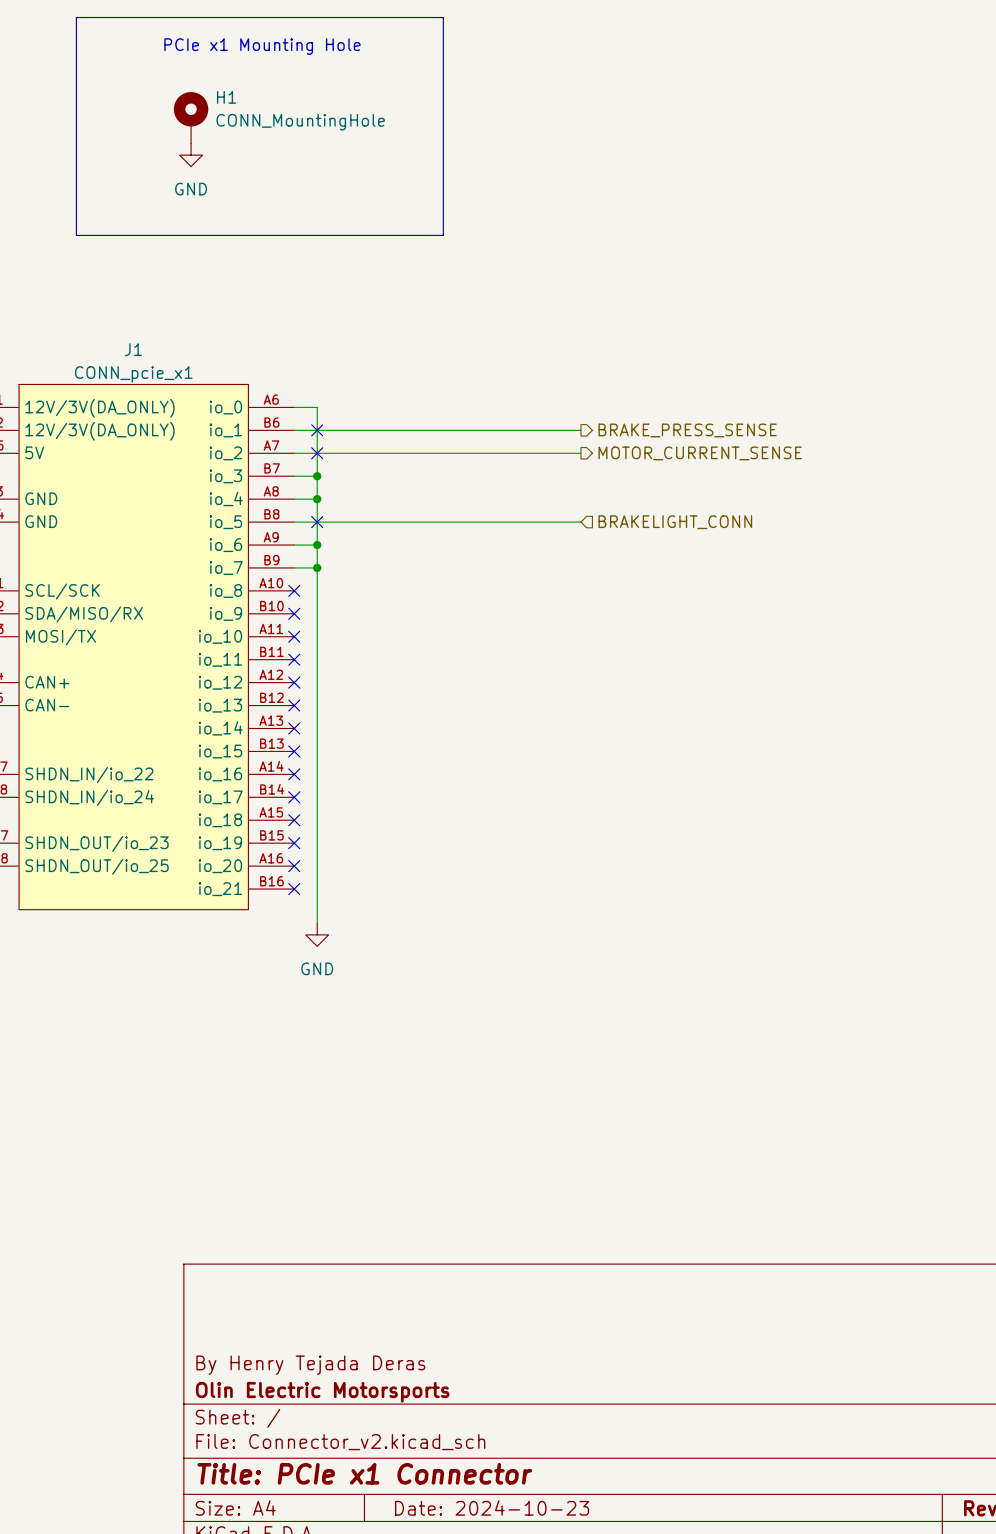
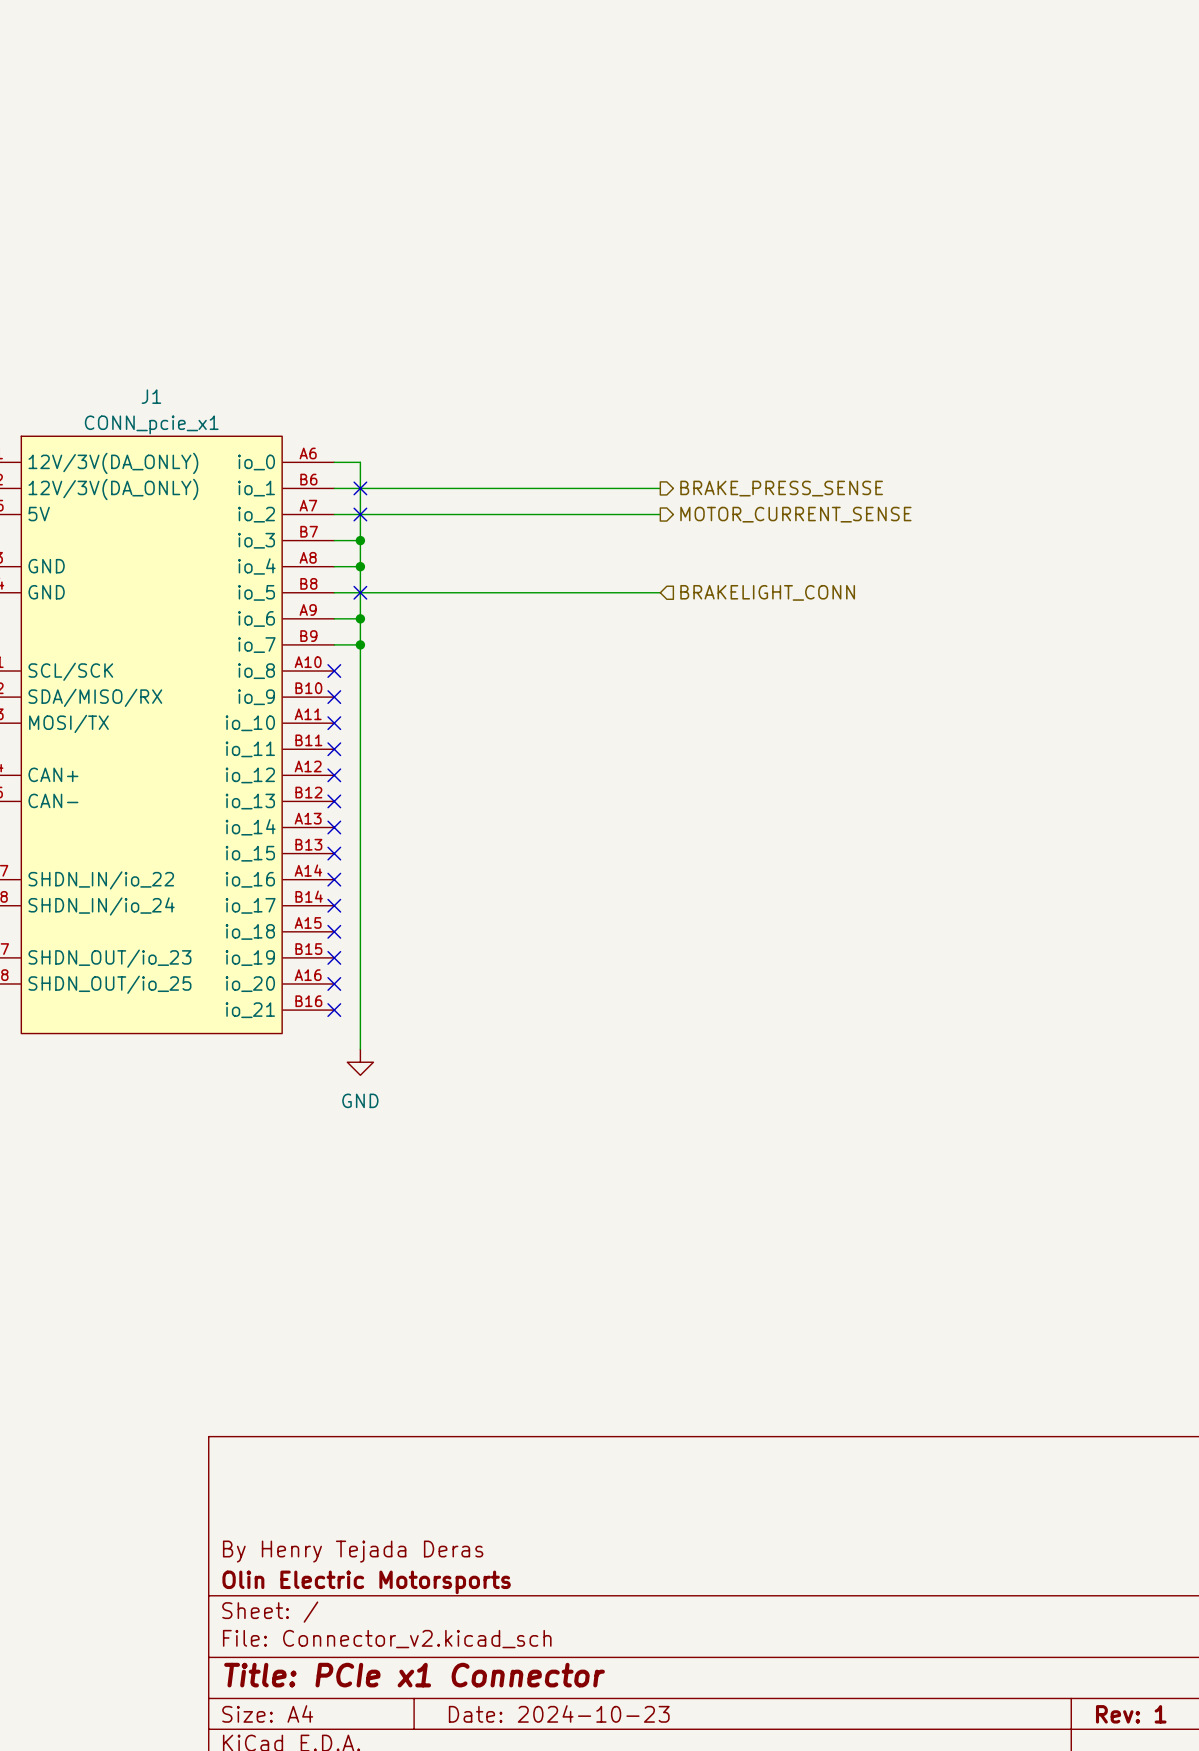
line: (76, 17) (443, 17) (443, 235) (76, 235) (76, 17) -> none
text: PCIe x1 Mounting Hole (262, 46) -> none
H1: CONN_MountingHole (191, 117) -> none
power symbol: GND (191, 155) -> none

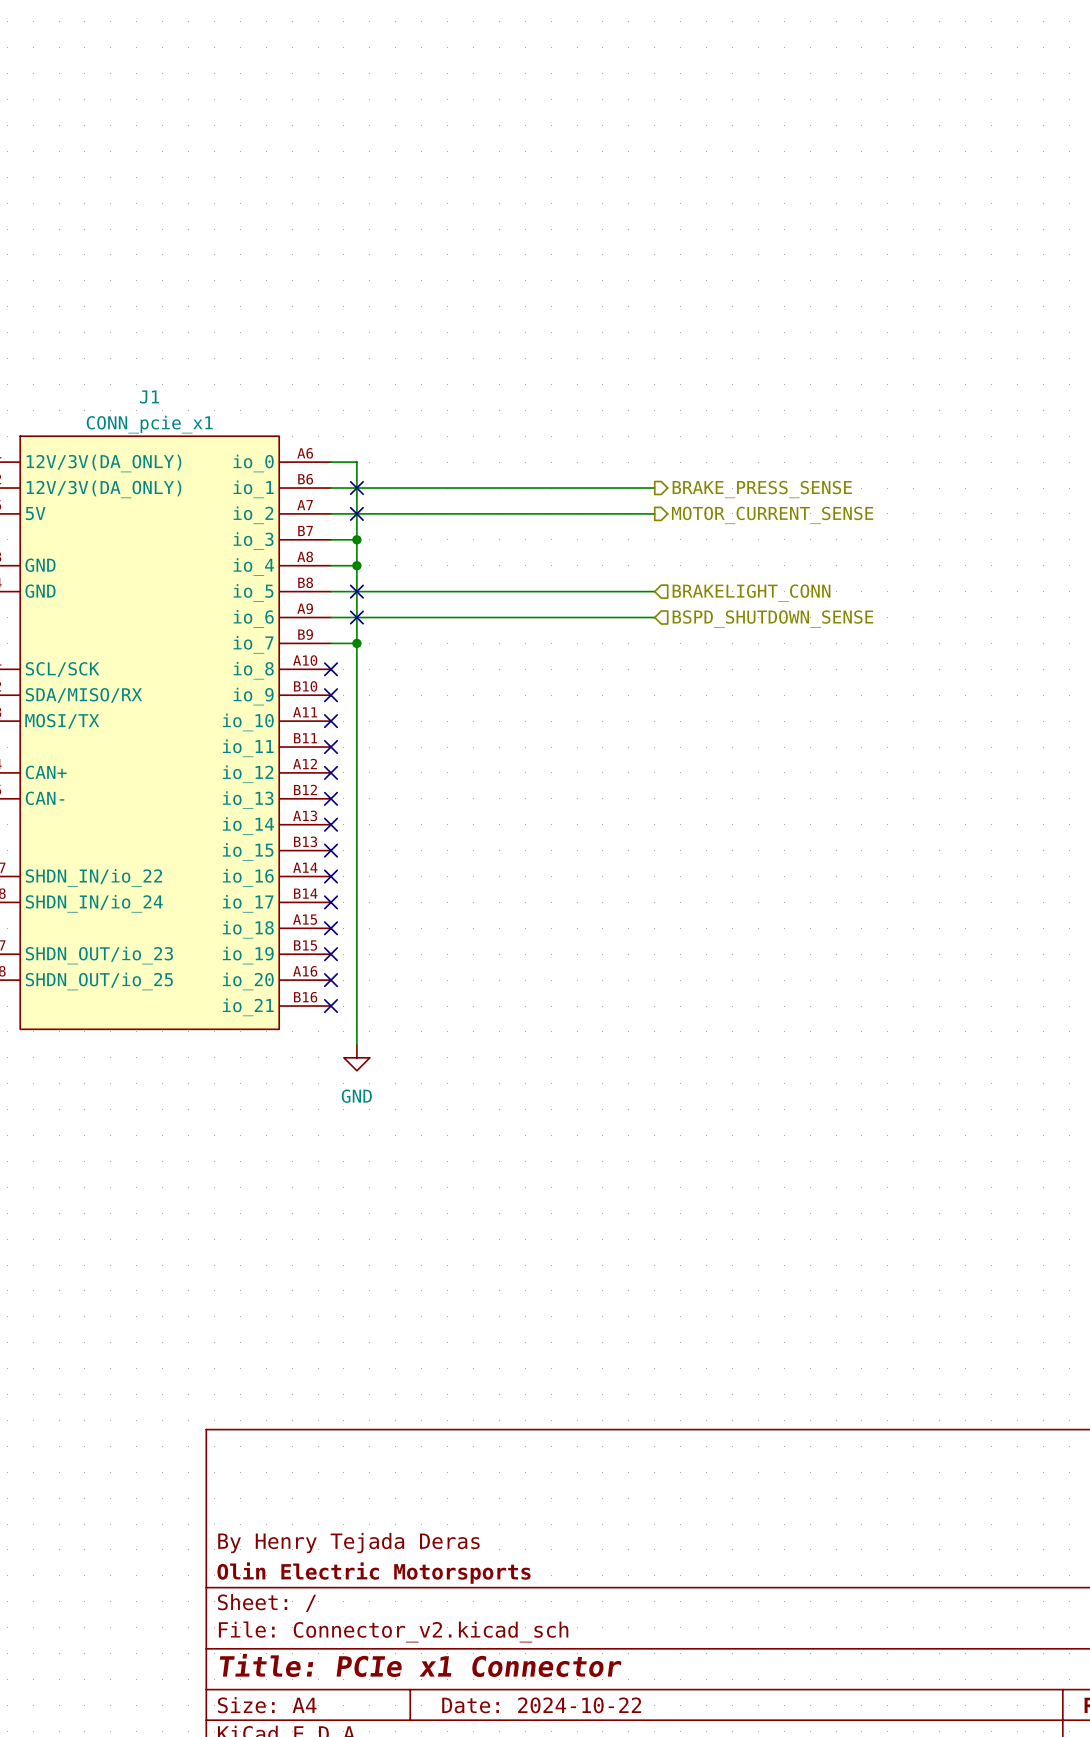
wire: none -> (356, 617) (654, 617)
junction: (360, 618) -> none
no-connect mark: none -> (356, 617)
hierarchical label: none -> BSPD_SHUTDOWN_SENSE (772, 619)
title block: Date: 2024-10-23 (559, 1713) -> Date: 2024-10-22 (541, 1705)

